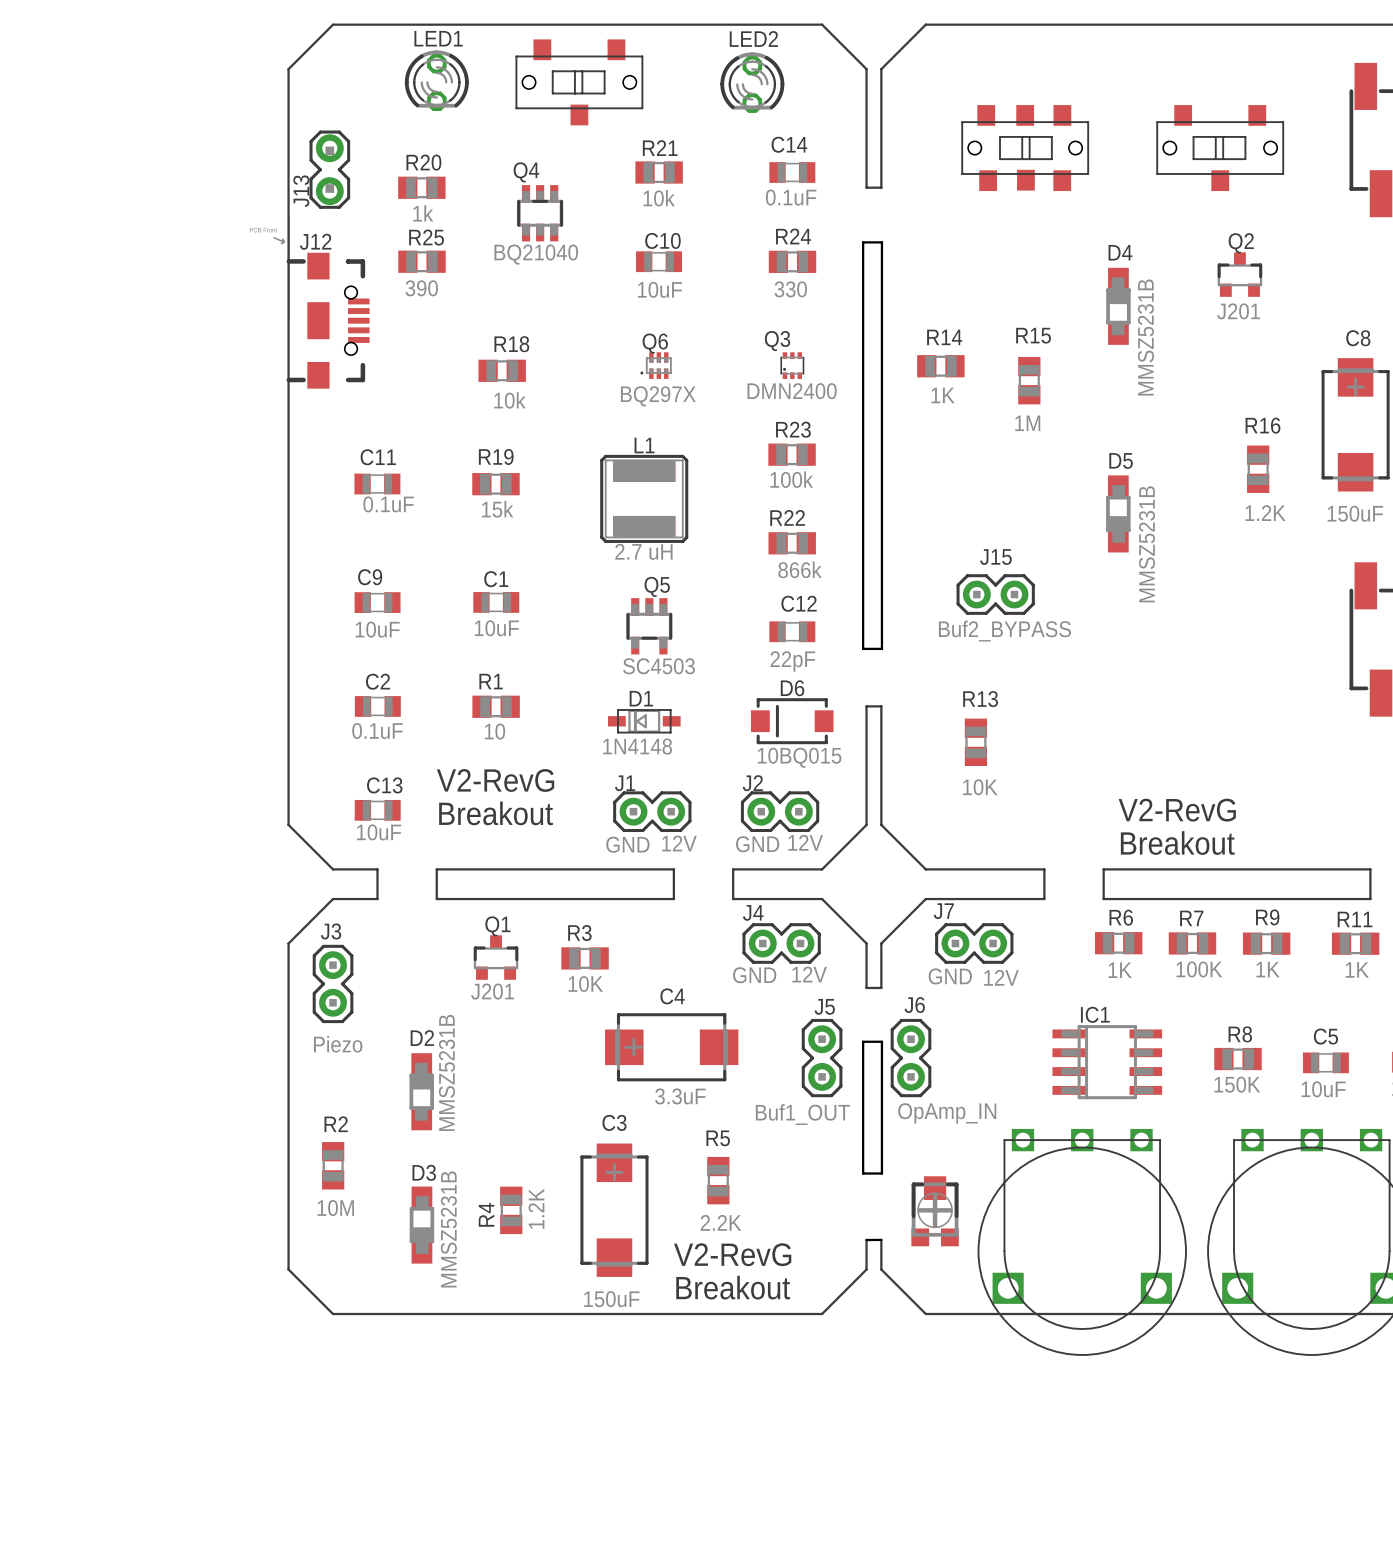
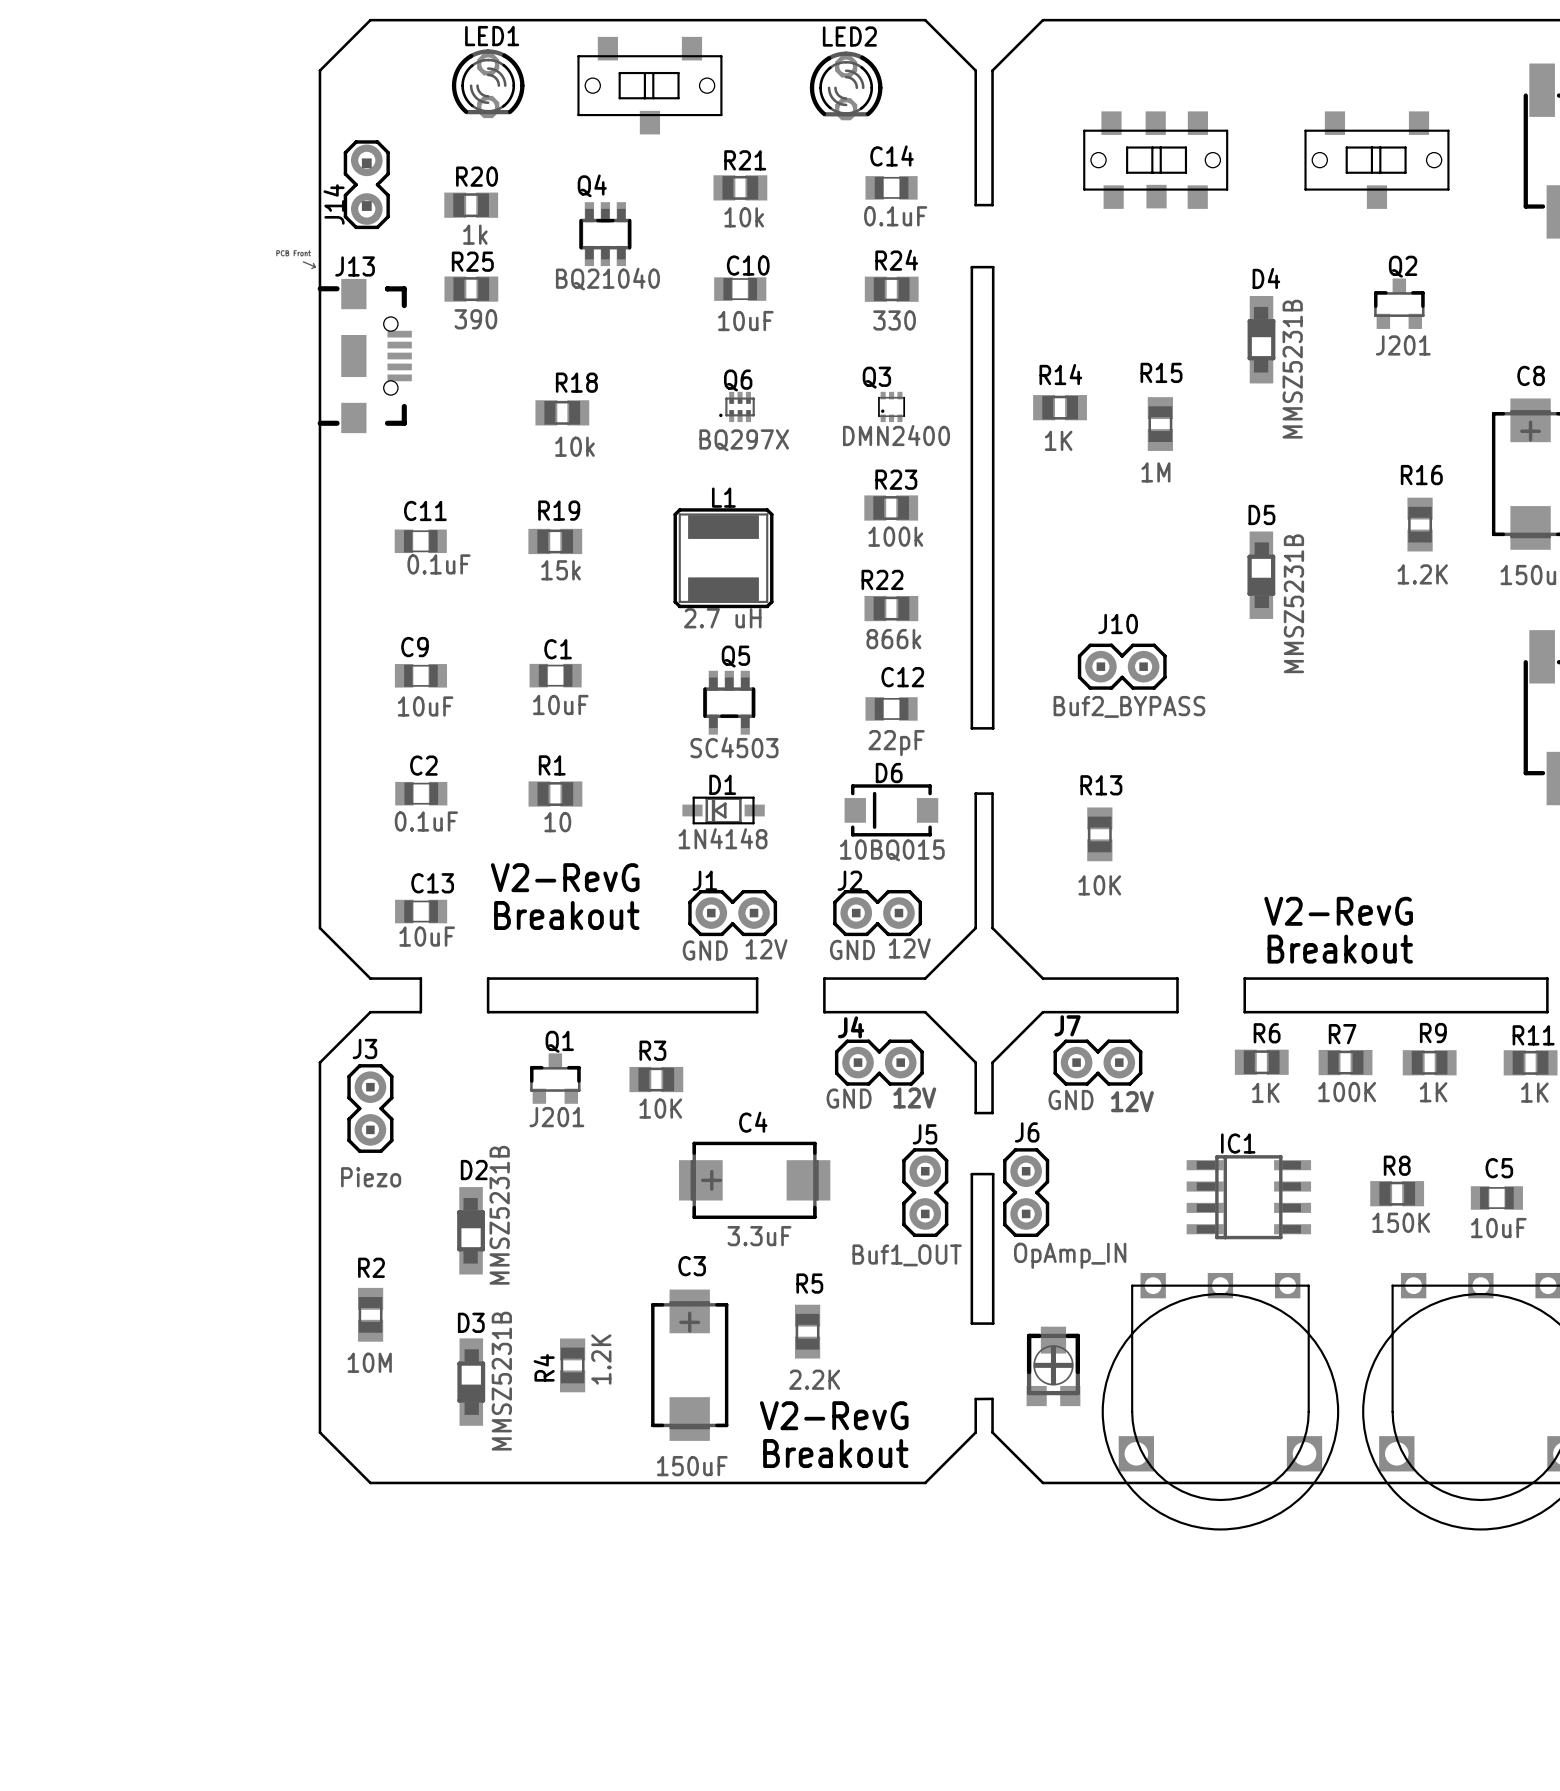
J13 name: J13 (301, 191) -> J14 (334, 204)
J12 name: J12 (315, 241) -> J13 (355, 266)
J15 name: J15 (995, 557) -> J10 (1118, 624)

